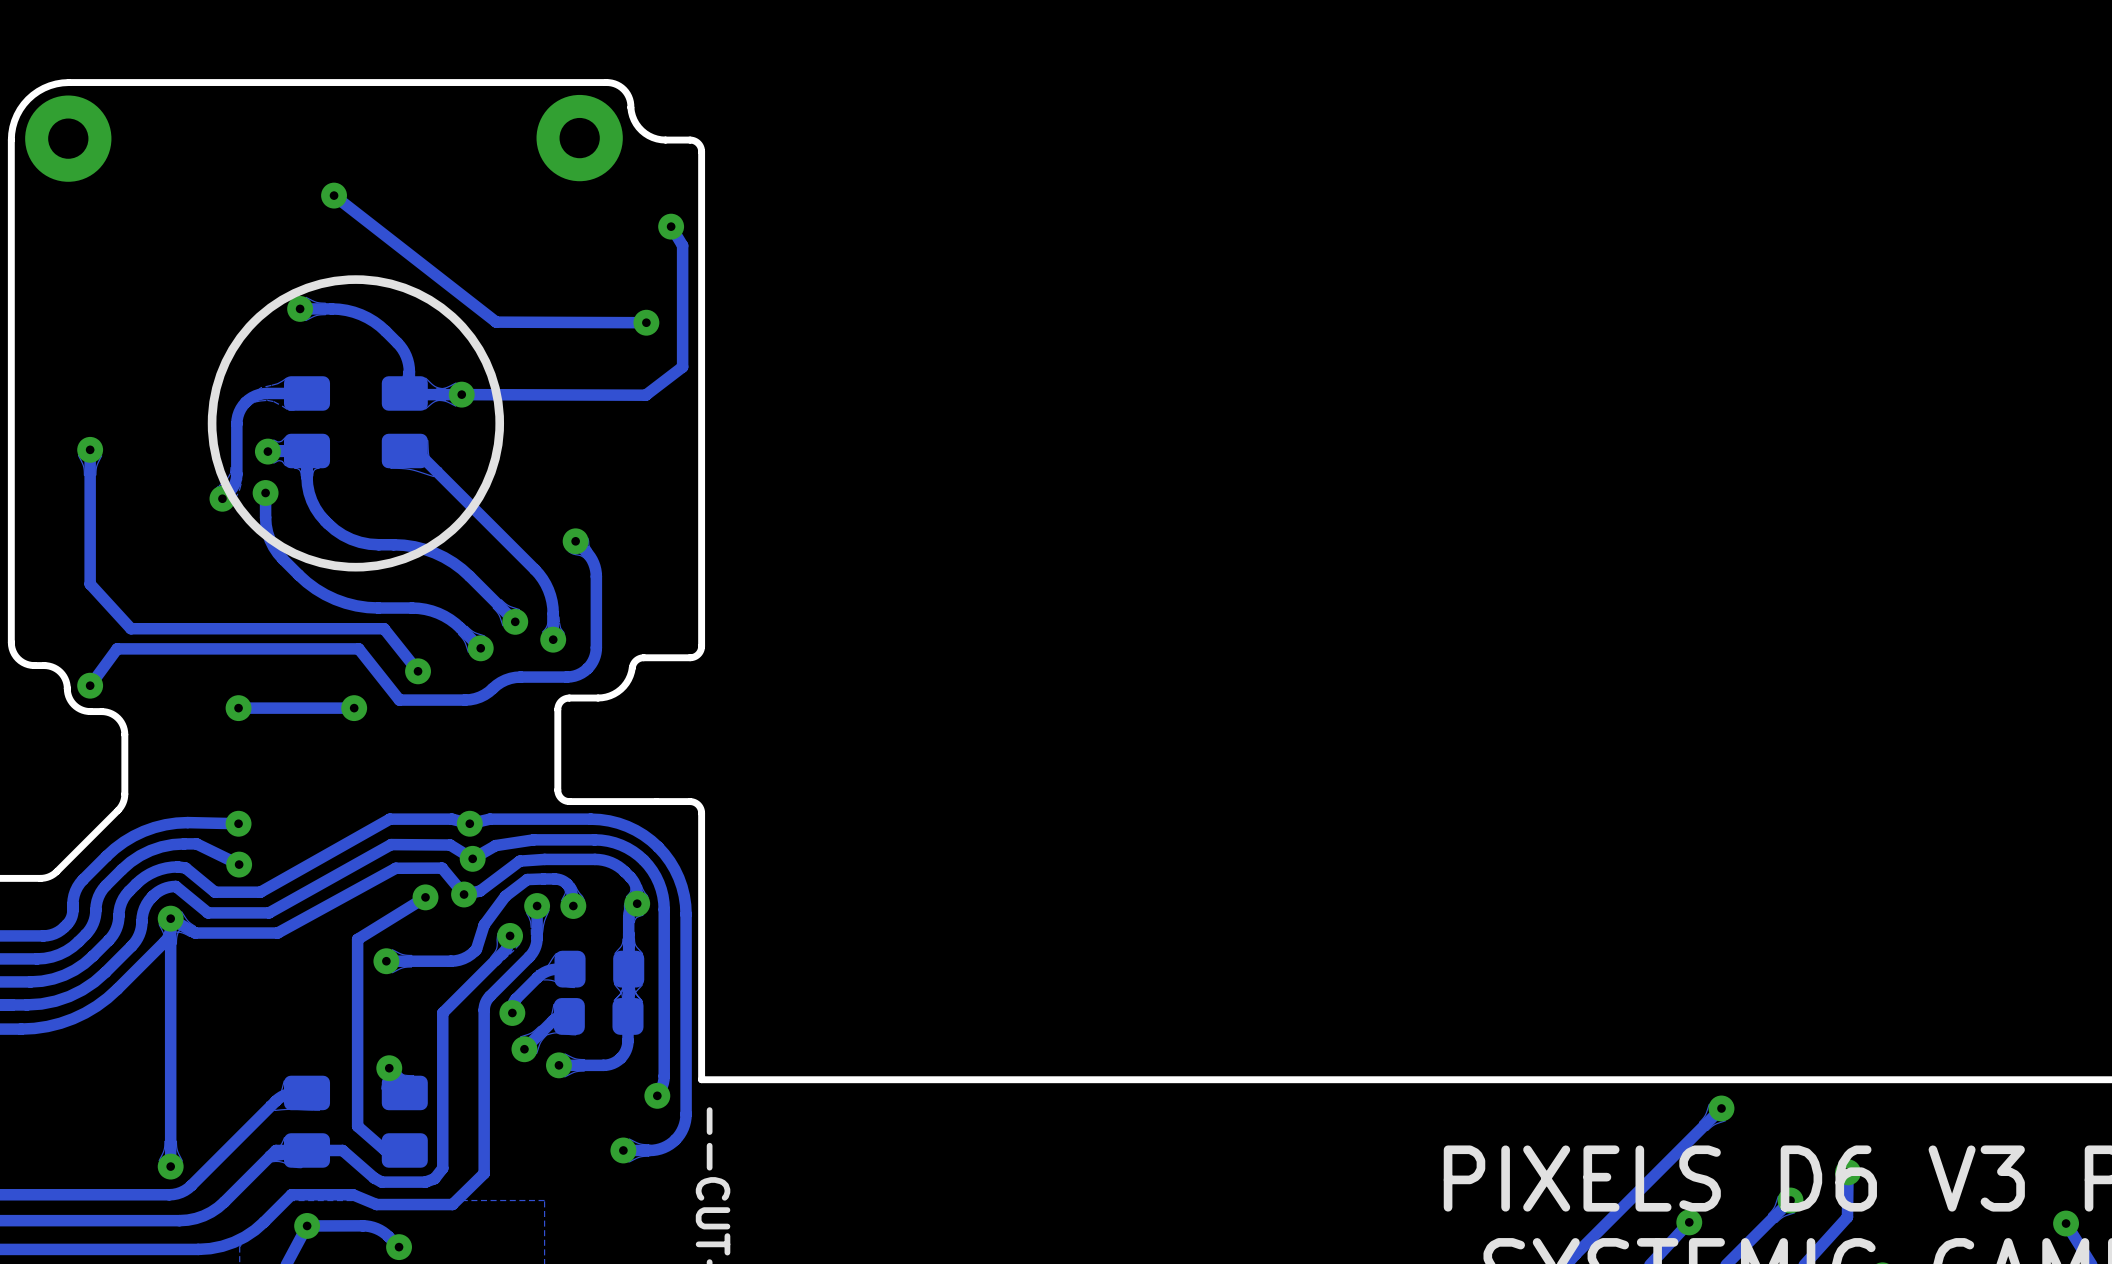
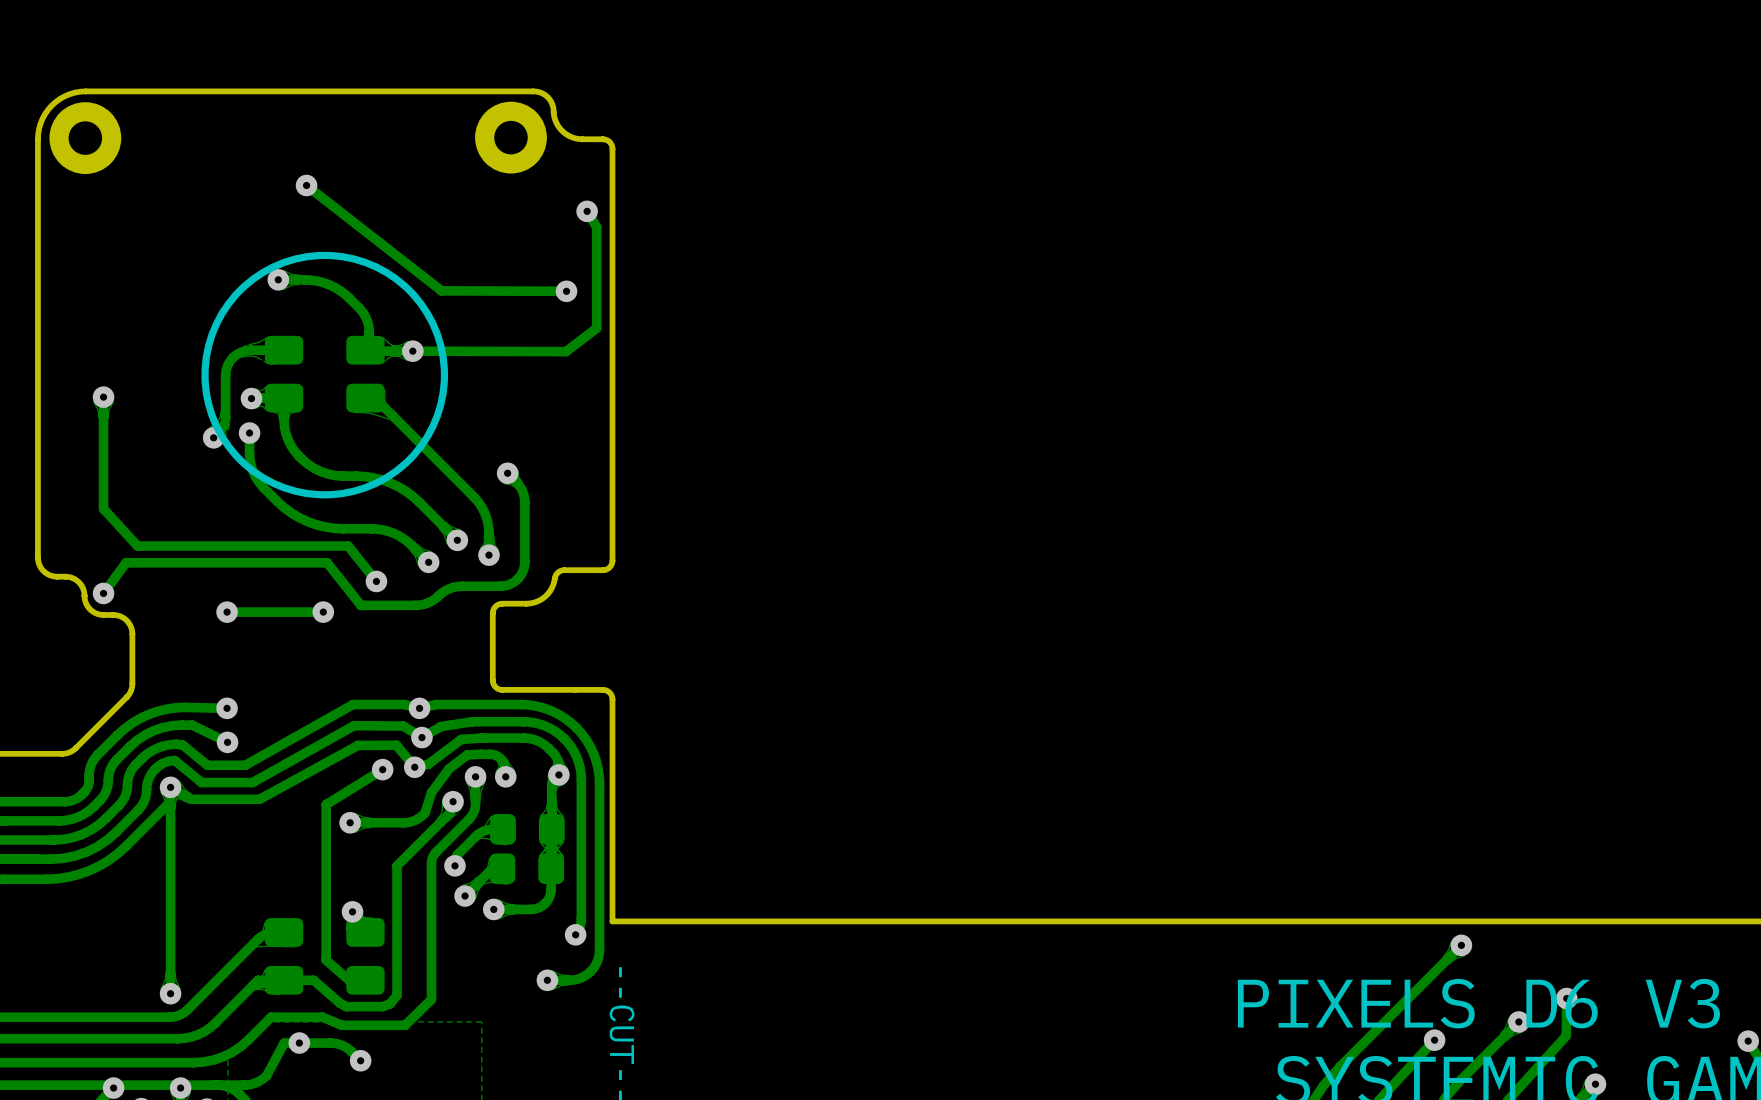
via position: (307, 1225) -> (299, 1043)

